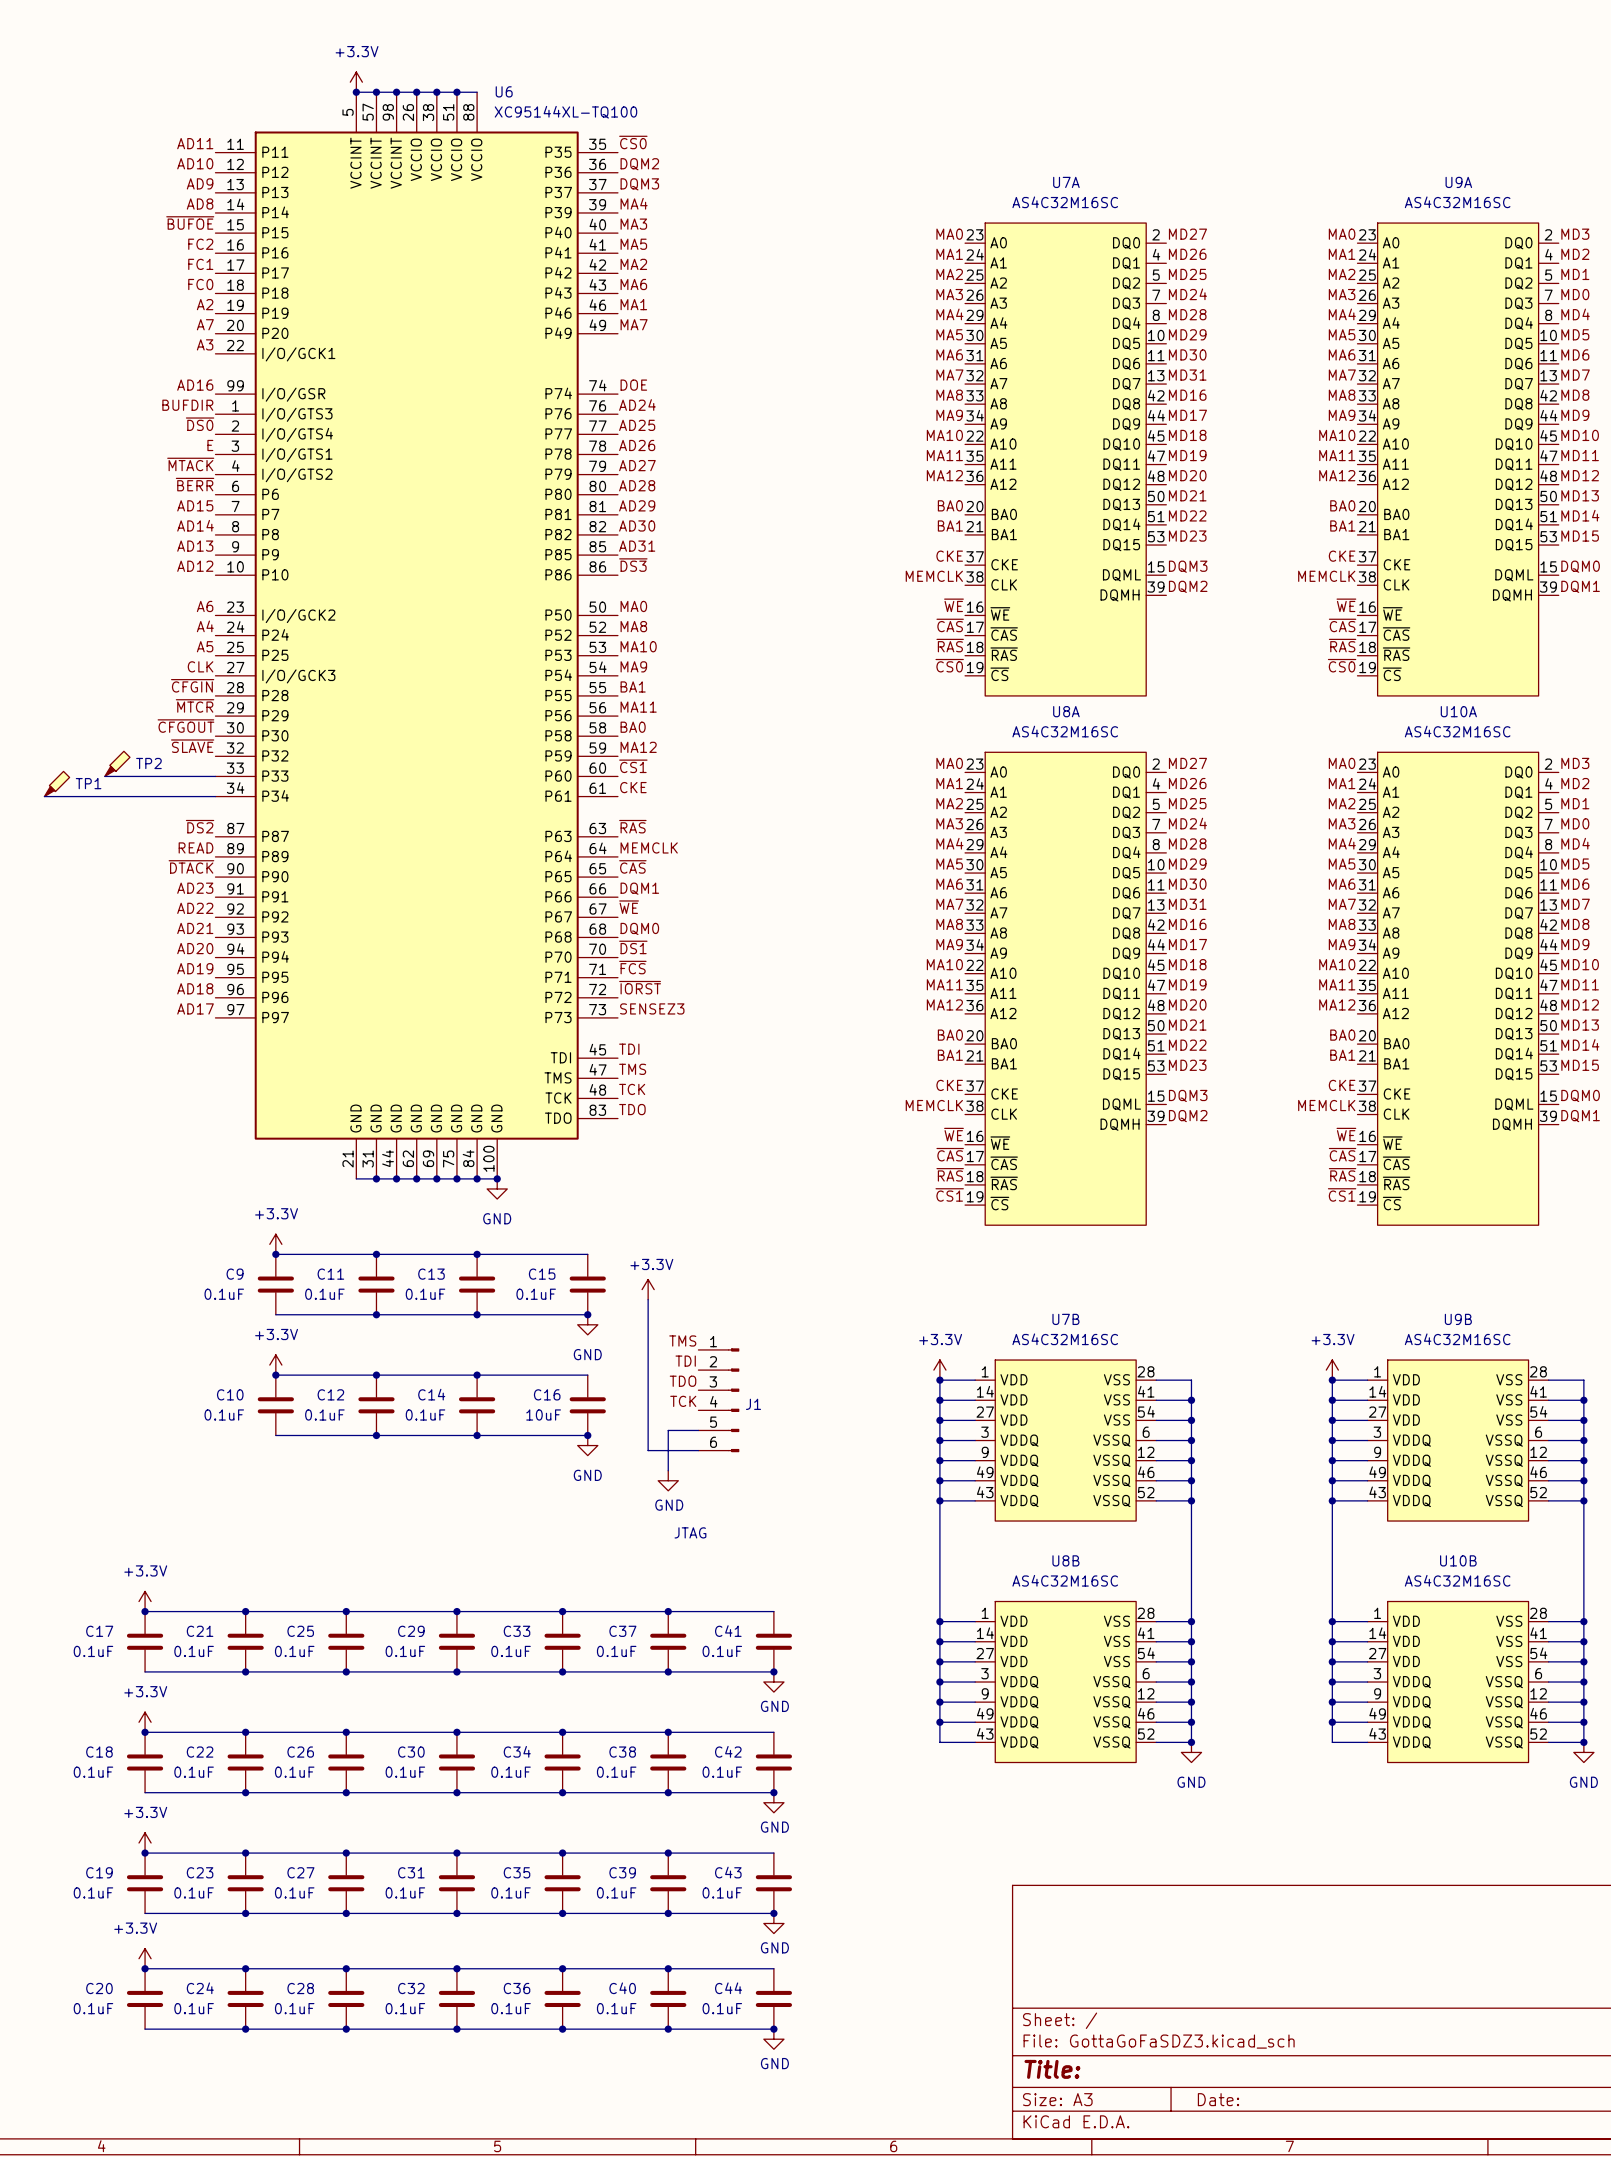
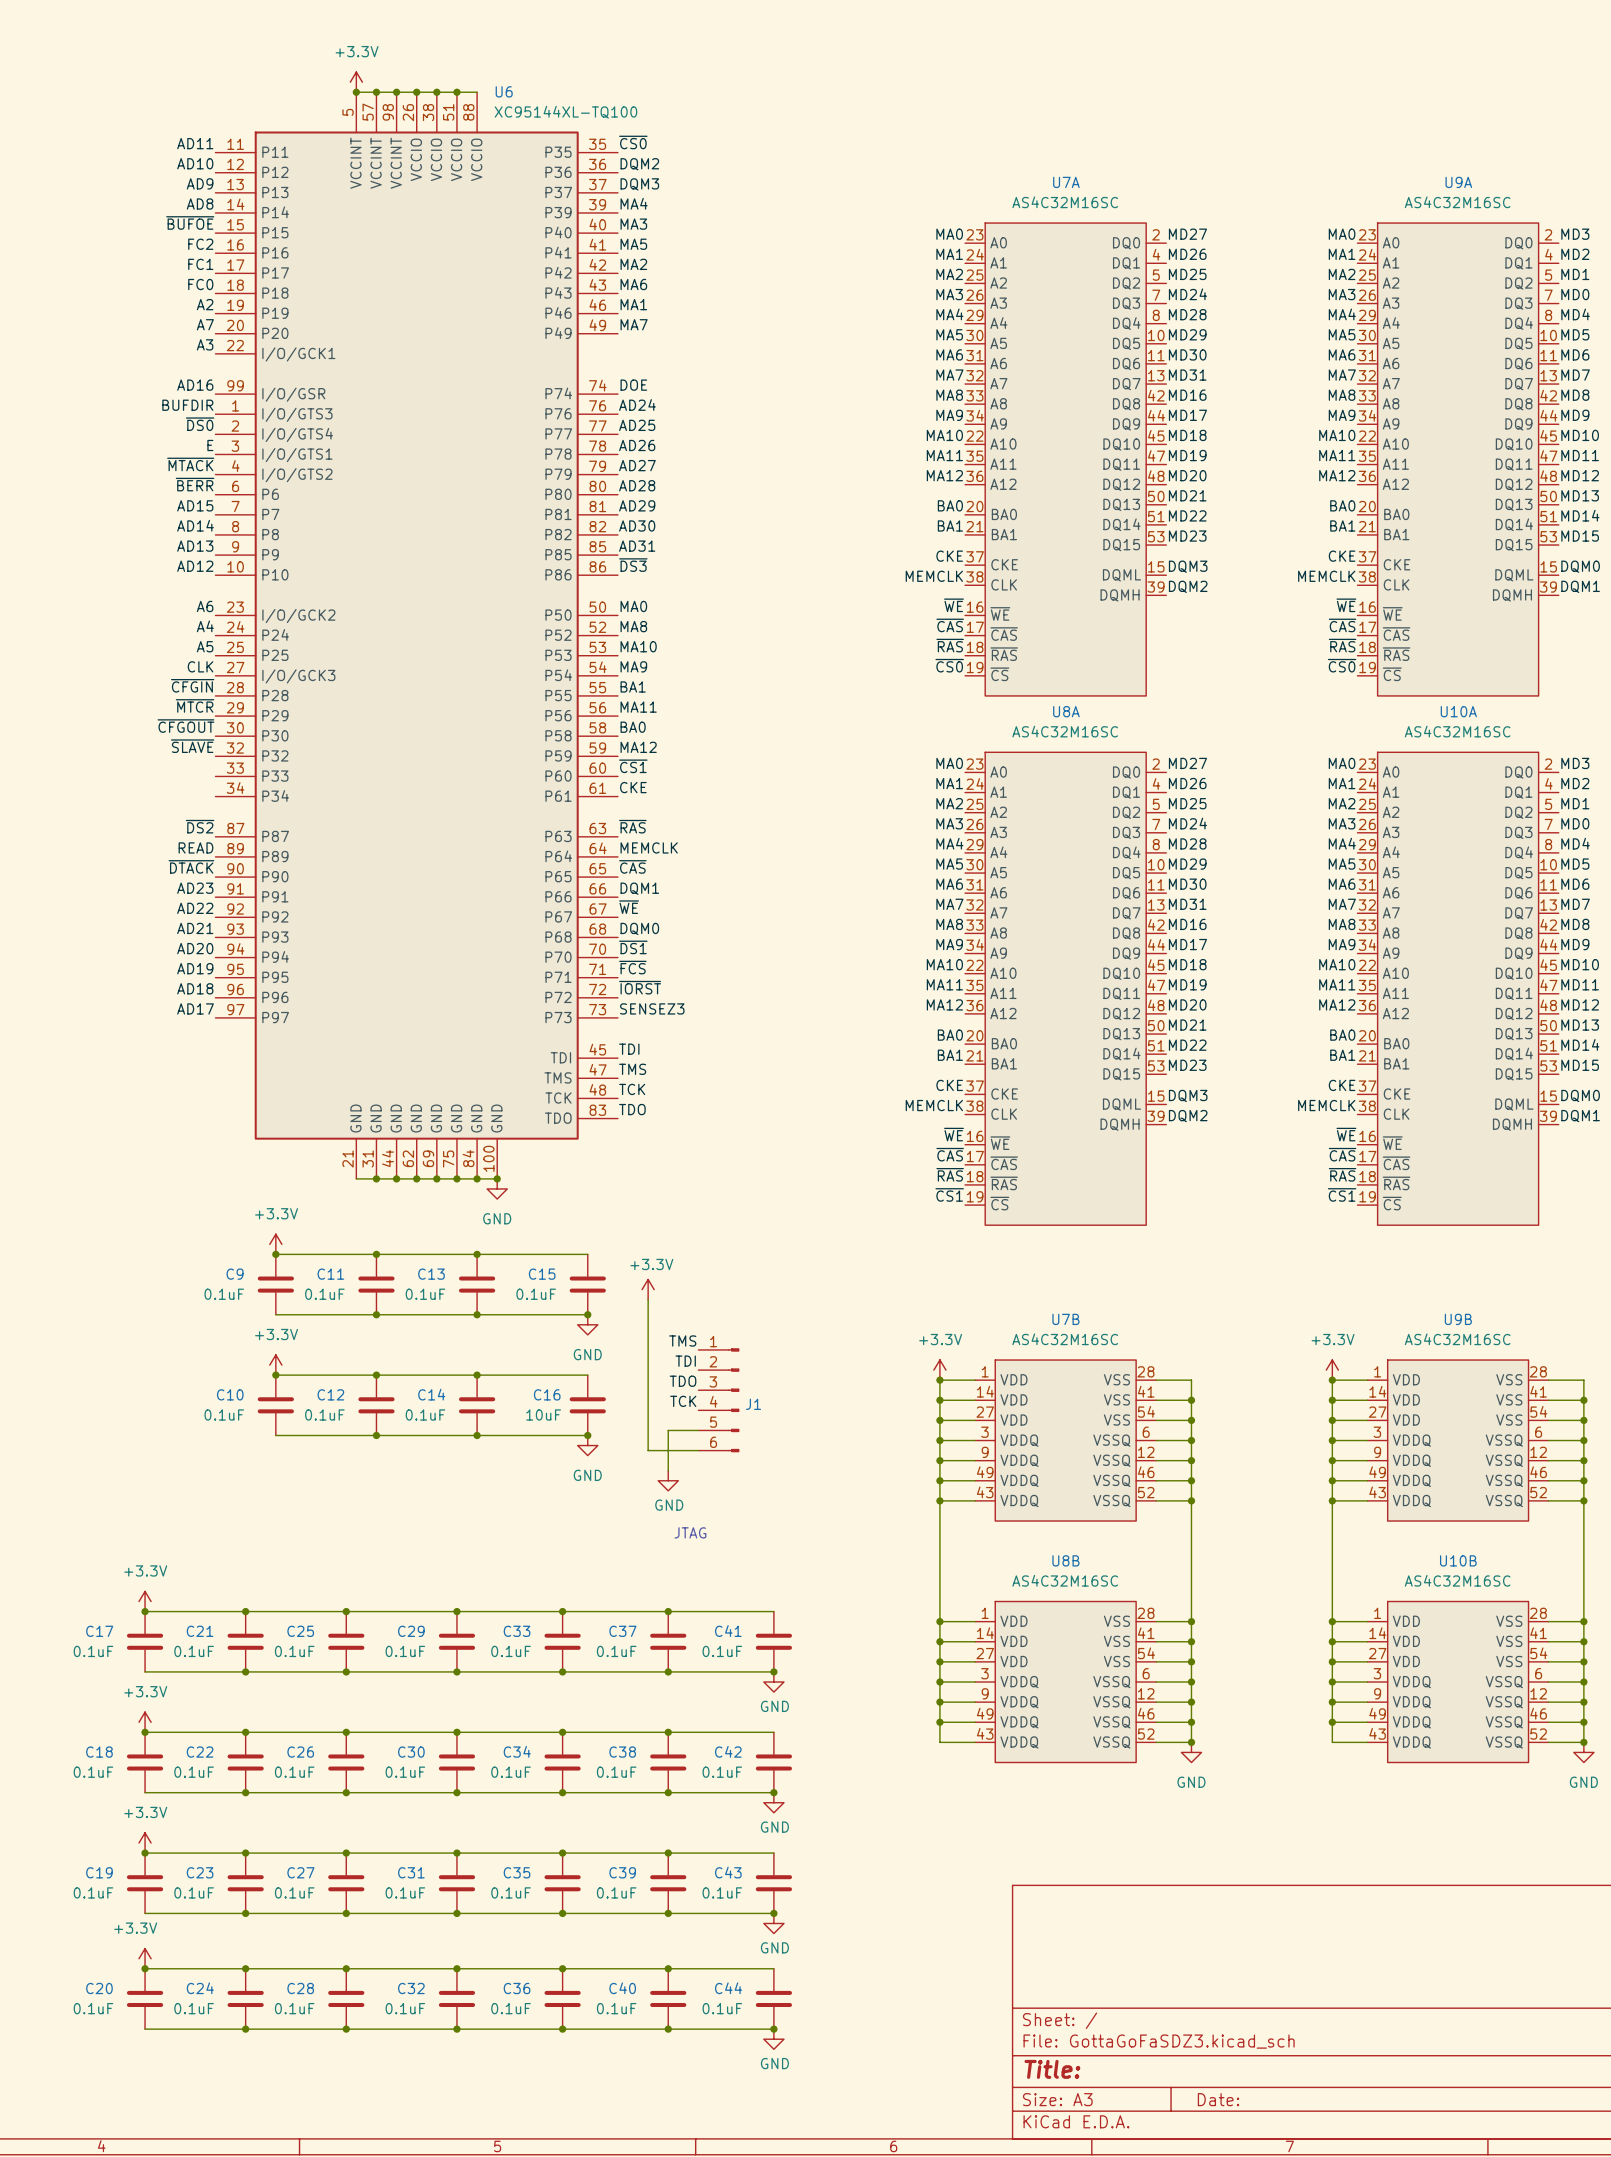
TP2: (117, 763) -> none
wire: (104, 776) (215, 776) -> none
TP1: (57, 783) -> none
wire: (44, 796) (215, 796) -> none

